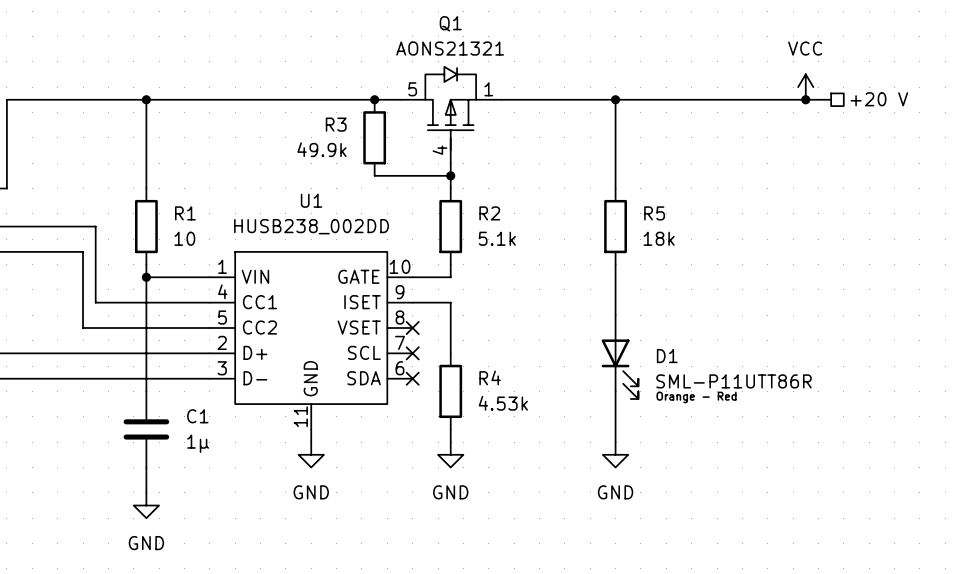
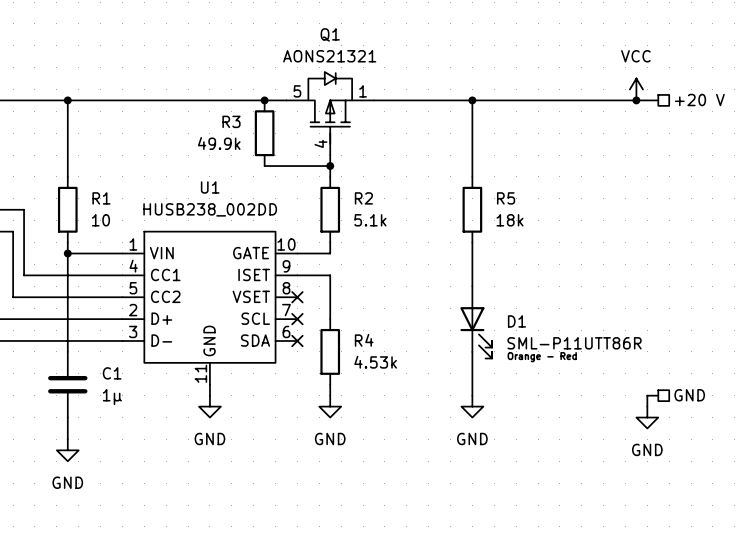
hierarchical label: none -> GND (689, 395)
wire: none -> (658, 395) (647, 395) (647, 406)
power symbol: none -> GND (647, 417)

